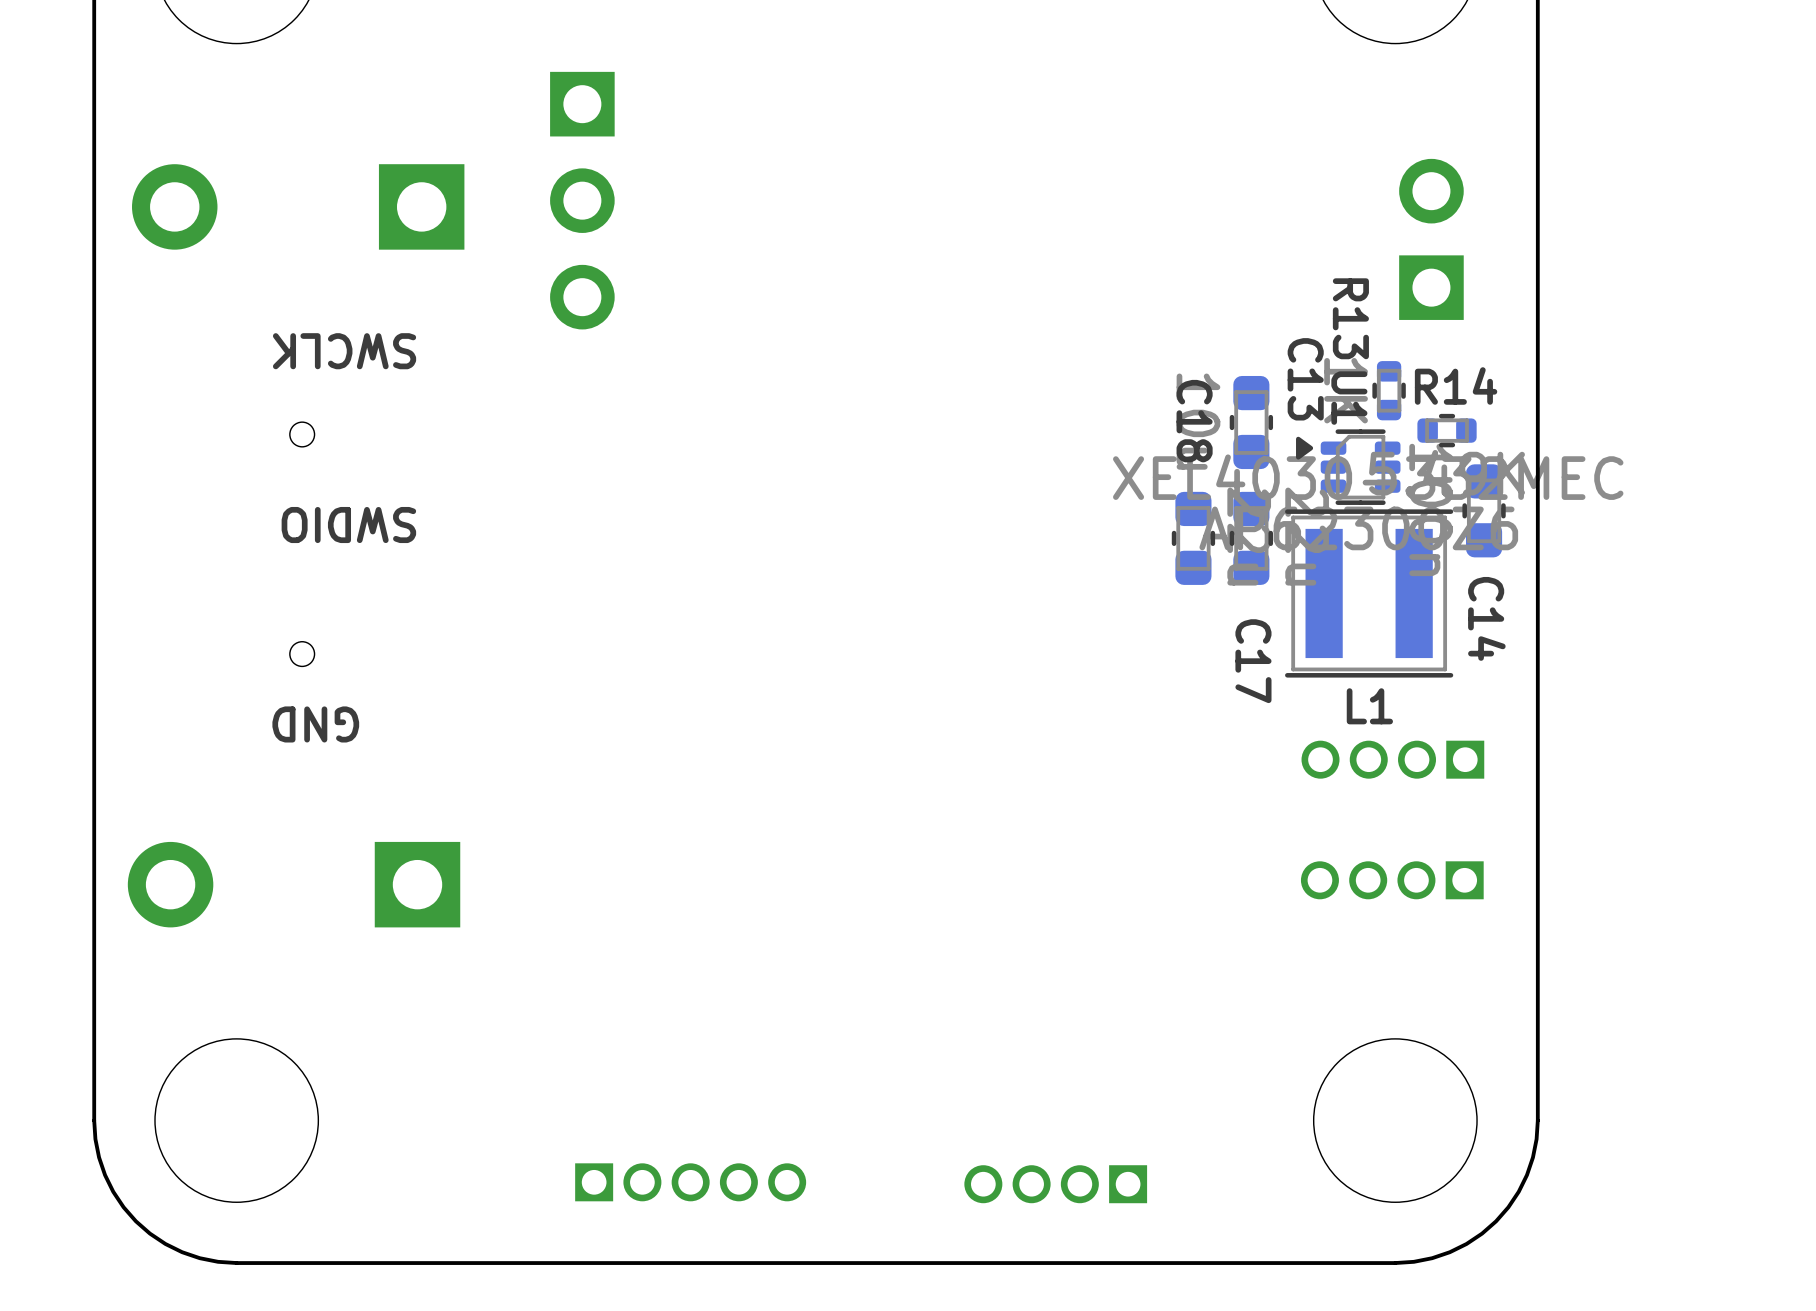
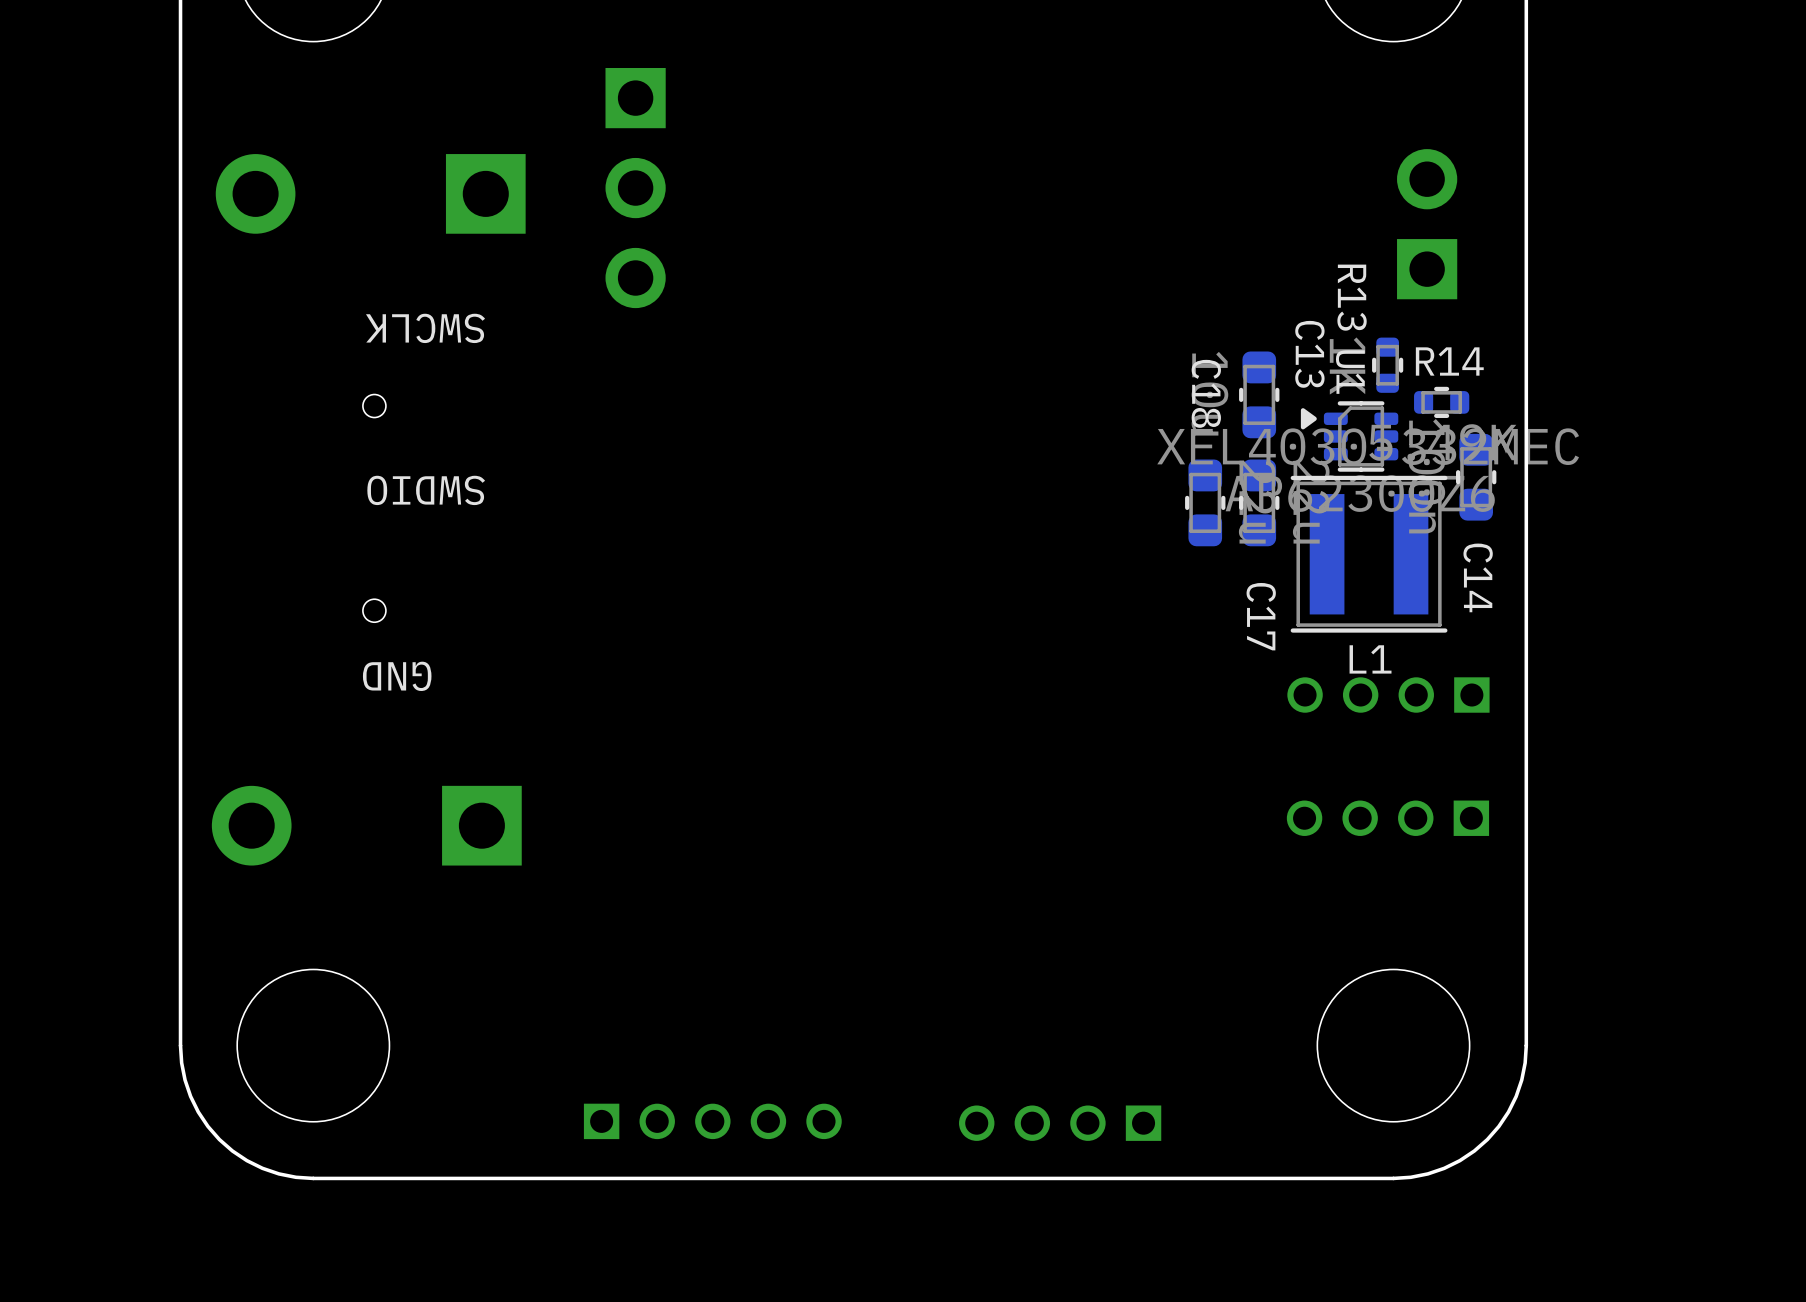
part footprint: [1301, 740, 1485, 779] -> [1287, 677, 1490, 713]
part footprint: [1300, 861, 1484, 900] -> [1286, 800, 1490, 836]
part footprint: [575, 1163, 807, 1202] -> [583, 1103, 842, 1140]
part footprint: [964, 1165, 1148, 1204] -> [959, 1105, 1162, 1141]

